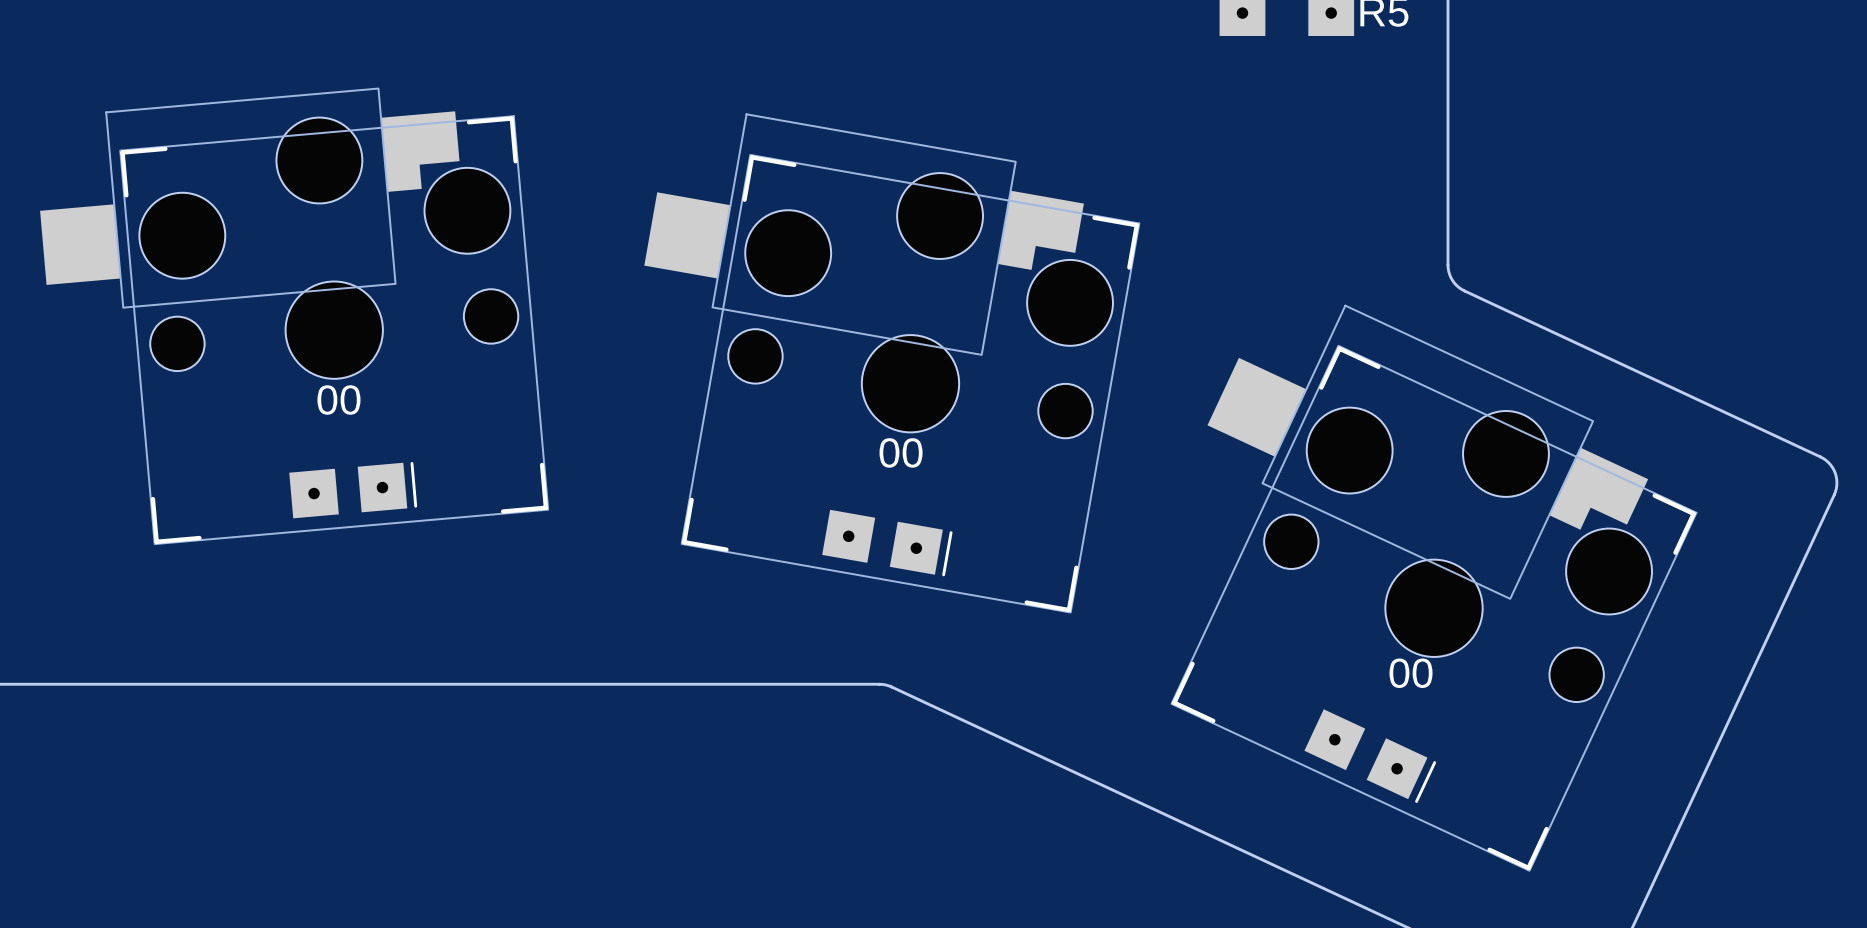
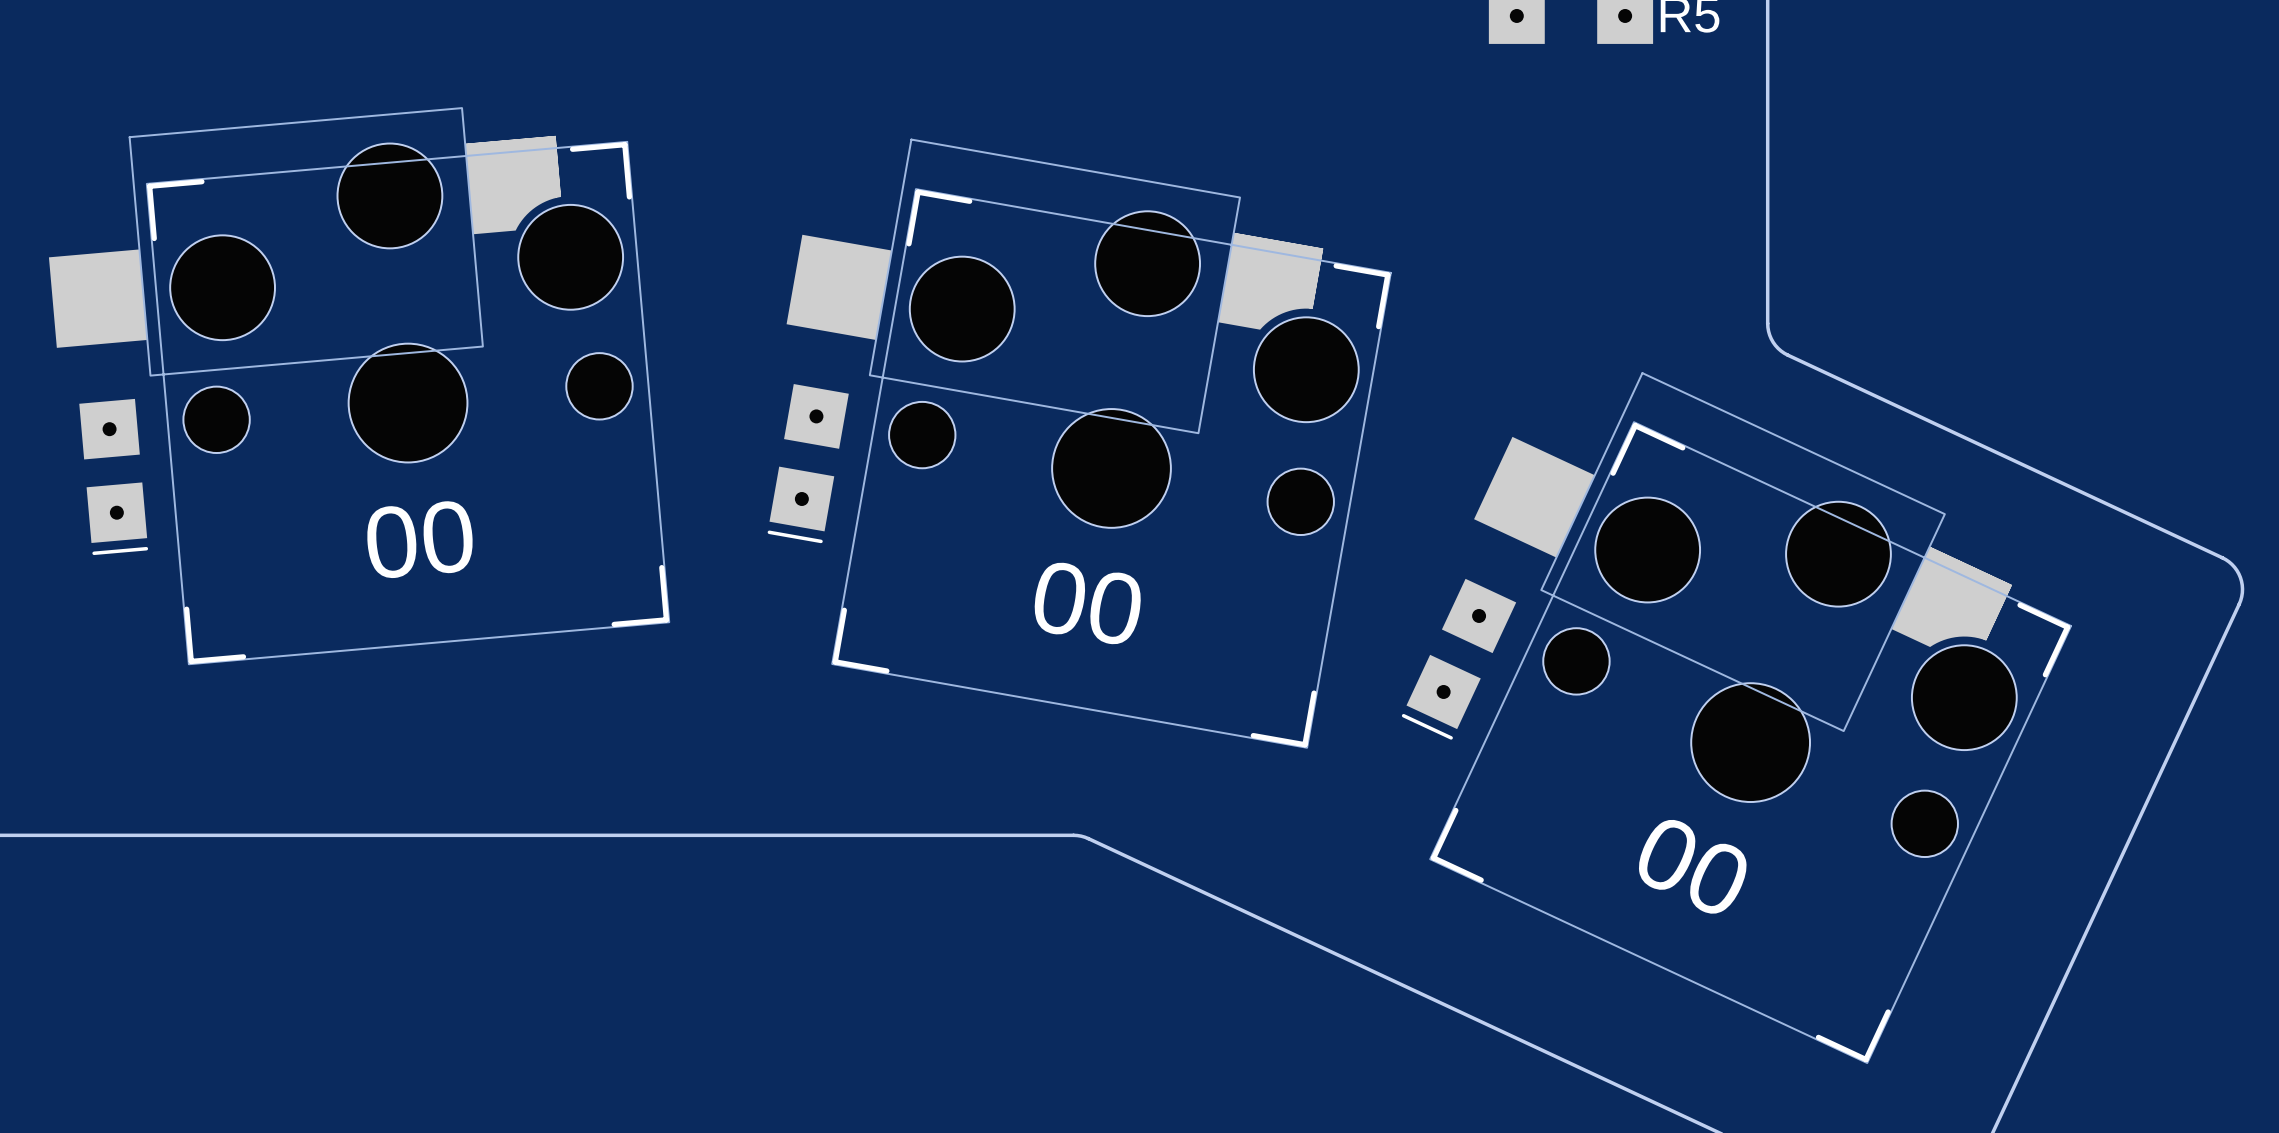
part footprint: [40, 88, 549, 545] -> [48, 108, 670, 665]
part footprint: [644, 114, 1140, 613] -> [767, 139, 1391, 748]
part footprint: [1171, 305, 1697, 871] -> [1401, 373, 2072, 1064]

